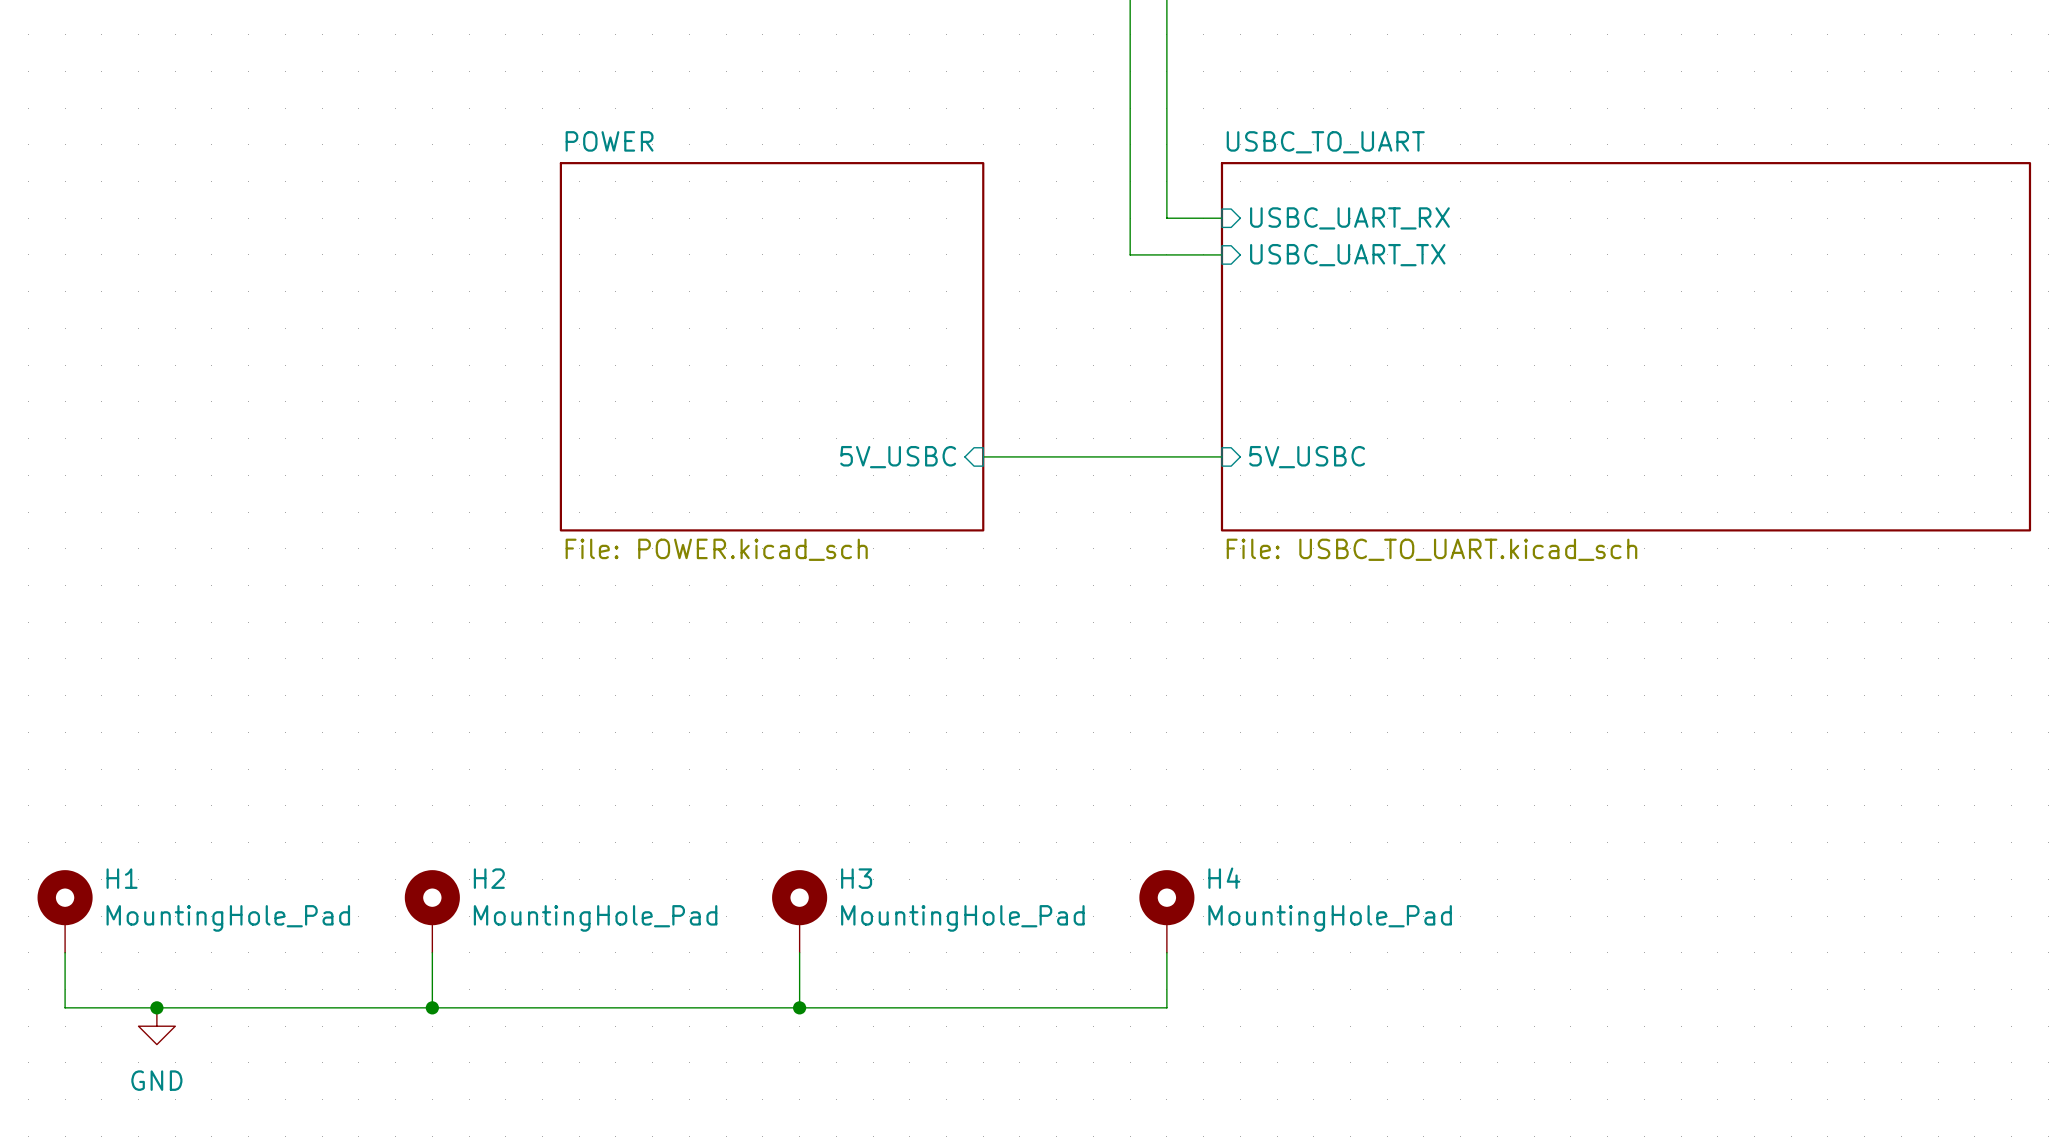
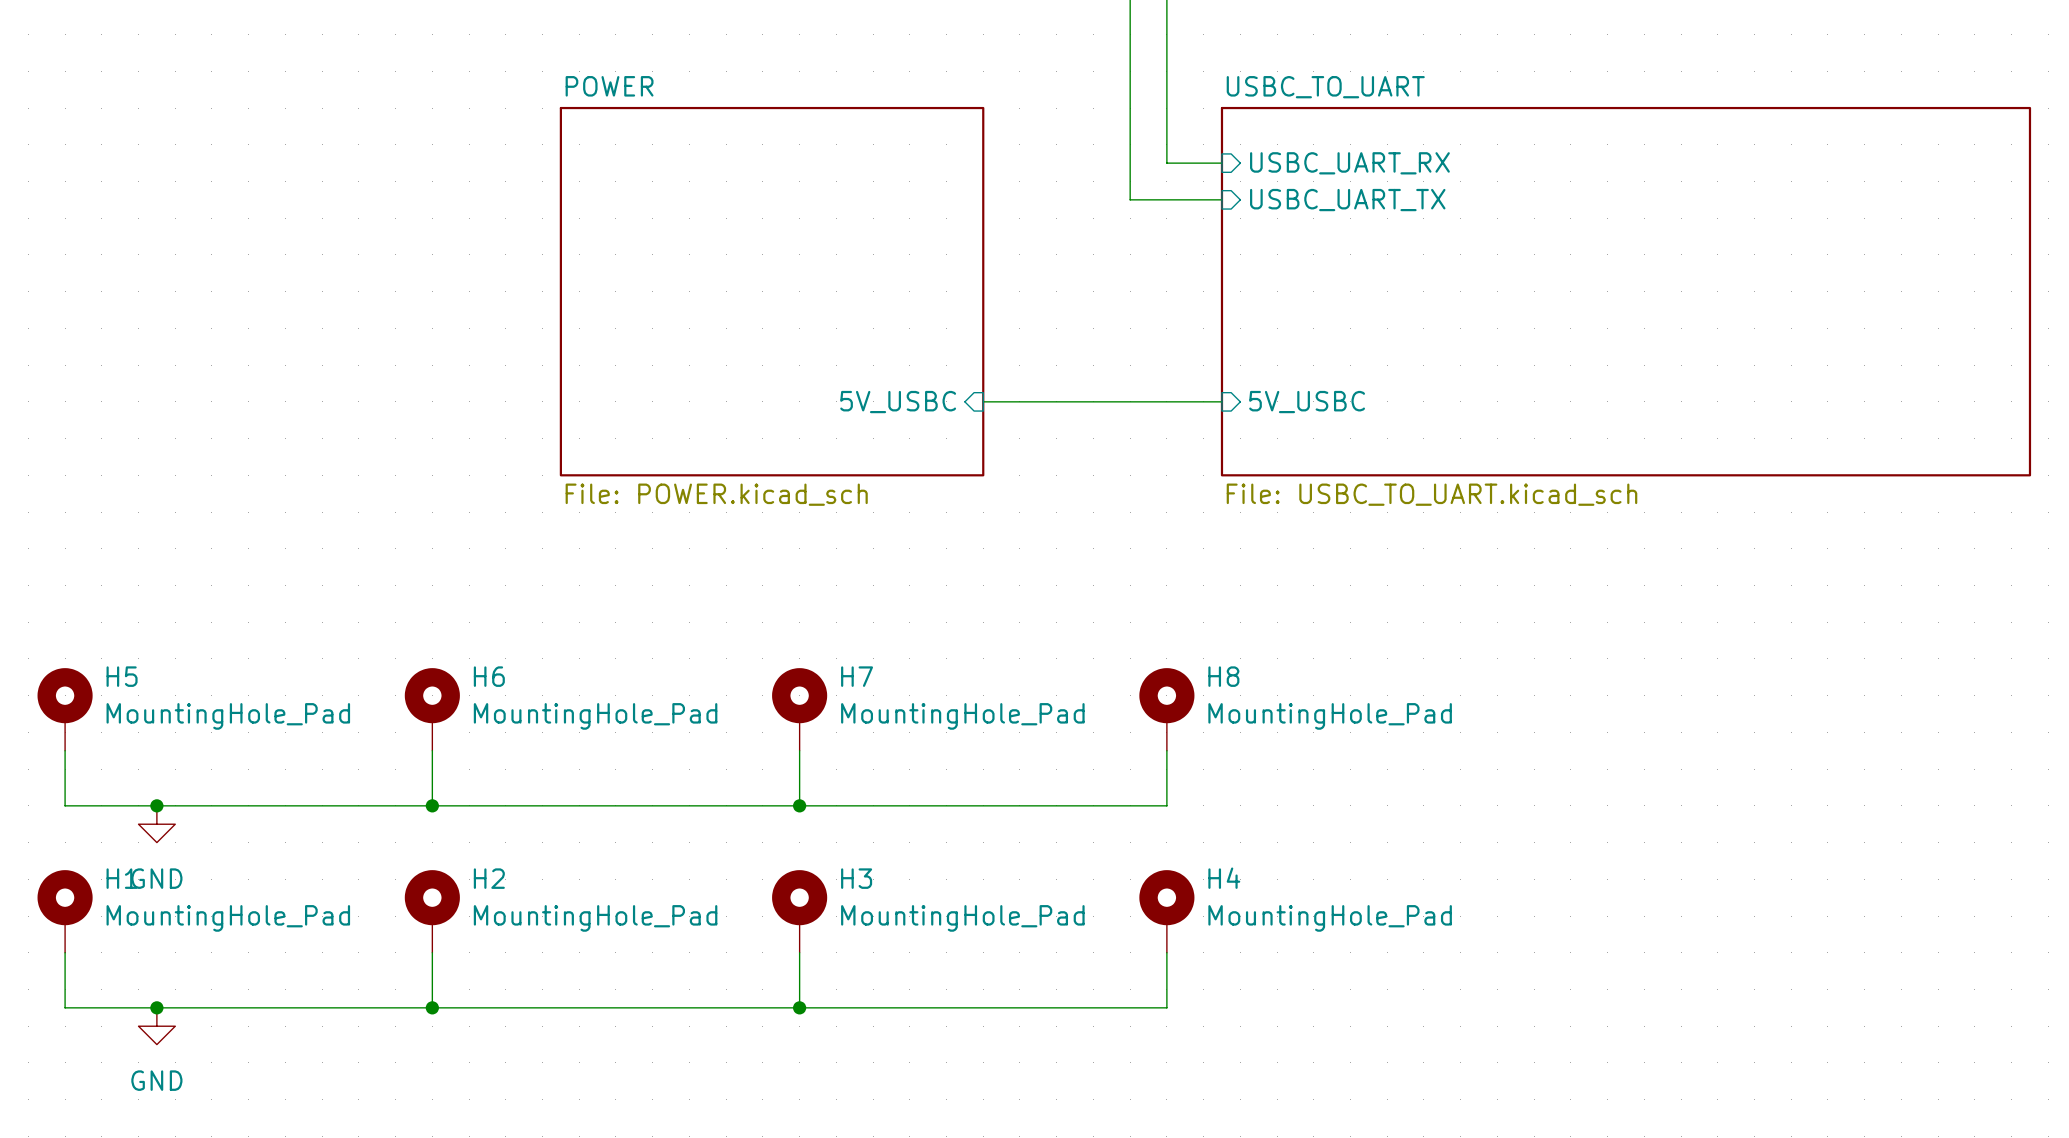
wire: (1166, 163) (1166, 218) (1221, 218) -> (1166, 163) (1221, 163)
wire: (1130, 199) (1130, 254) (1221, 254) -> (1130, 199) (1221, 199)
sheet pin position: USBC_UART_RX (1349, 218) -> USBC_UART_RX (1349, 163)
sheet pin position: USBC_UART_TX (1347, 255) -> USBC_UART_TX (1347, 200)
sheet POWER position: (772, 346) -> (772, 291)
sheet USBC_TO_UART position: (1625, 346) -> (1625, 291)
wire: (983, 456) (1221, 456) -> (983, 401) (1221, 401)
sheet pin position: 5V_USBC (898, 457) -> 5V_USBC (898, 402)
sheet pin position: 5V_USBC (1307, 457) -> 5V_USBC (1307, 402)
H5: none -> MountingHole_Pad (65, 709)
H6: none -> MountingHole_Pad (432, 709)
H7: none -> MountingHole_Pad (799, 709)
H8: none -> MountingHole_Pad (1166, 709)
wire: none -> (65, 750) (65, 805) (1166, 805) (1166, 750)
wire: none -> (432, 750) (432, 805)
wire: none -> (799, 750) (799, 805)
junction: none -> (156, 805)
junction: none -> (432, 805)
junction: none -> (799, 805)
power symbol: none -> GND (156, 824)

